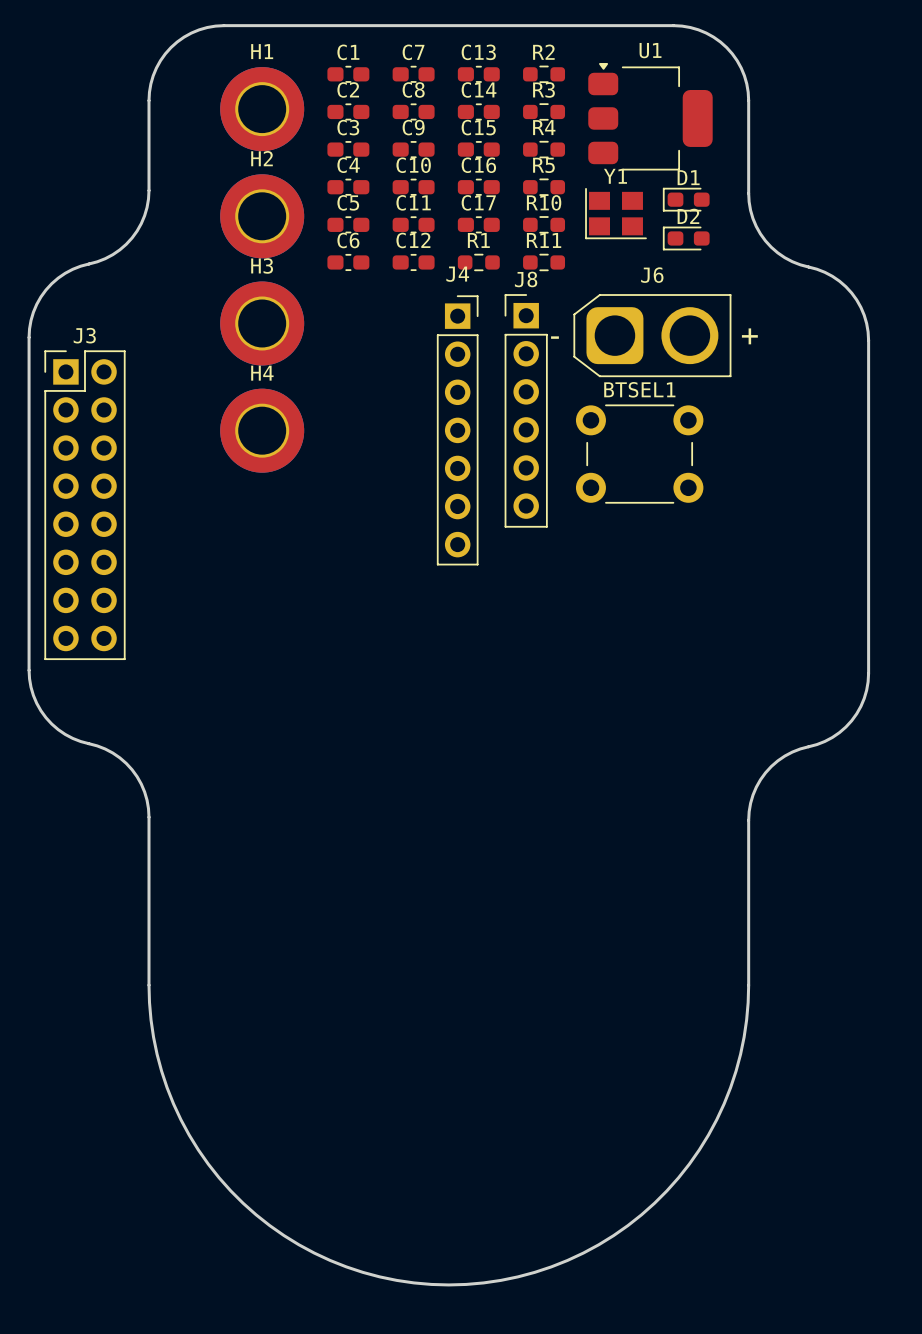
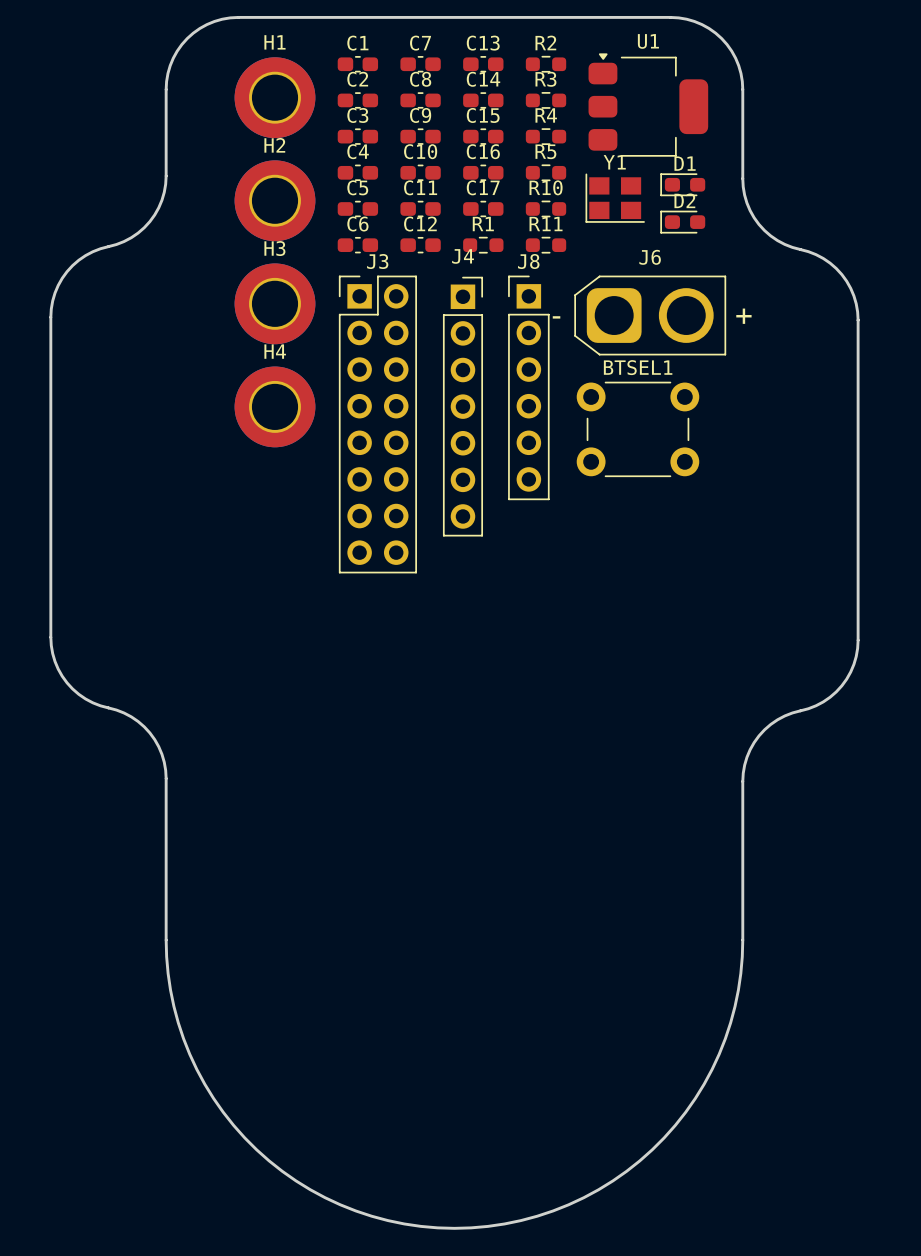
J3 position: (84, 505) -> (377, 424)

